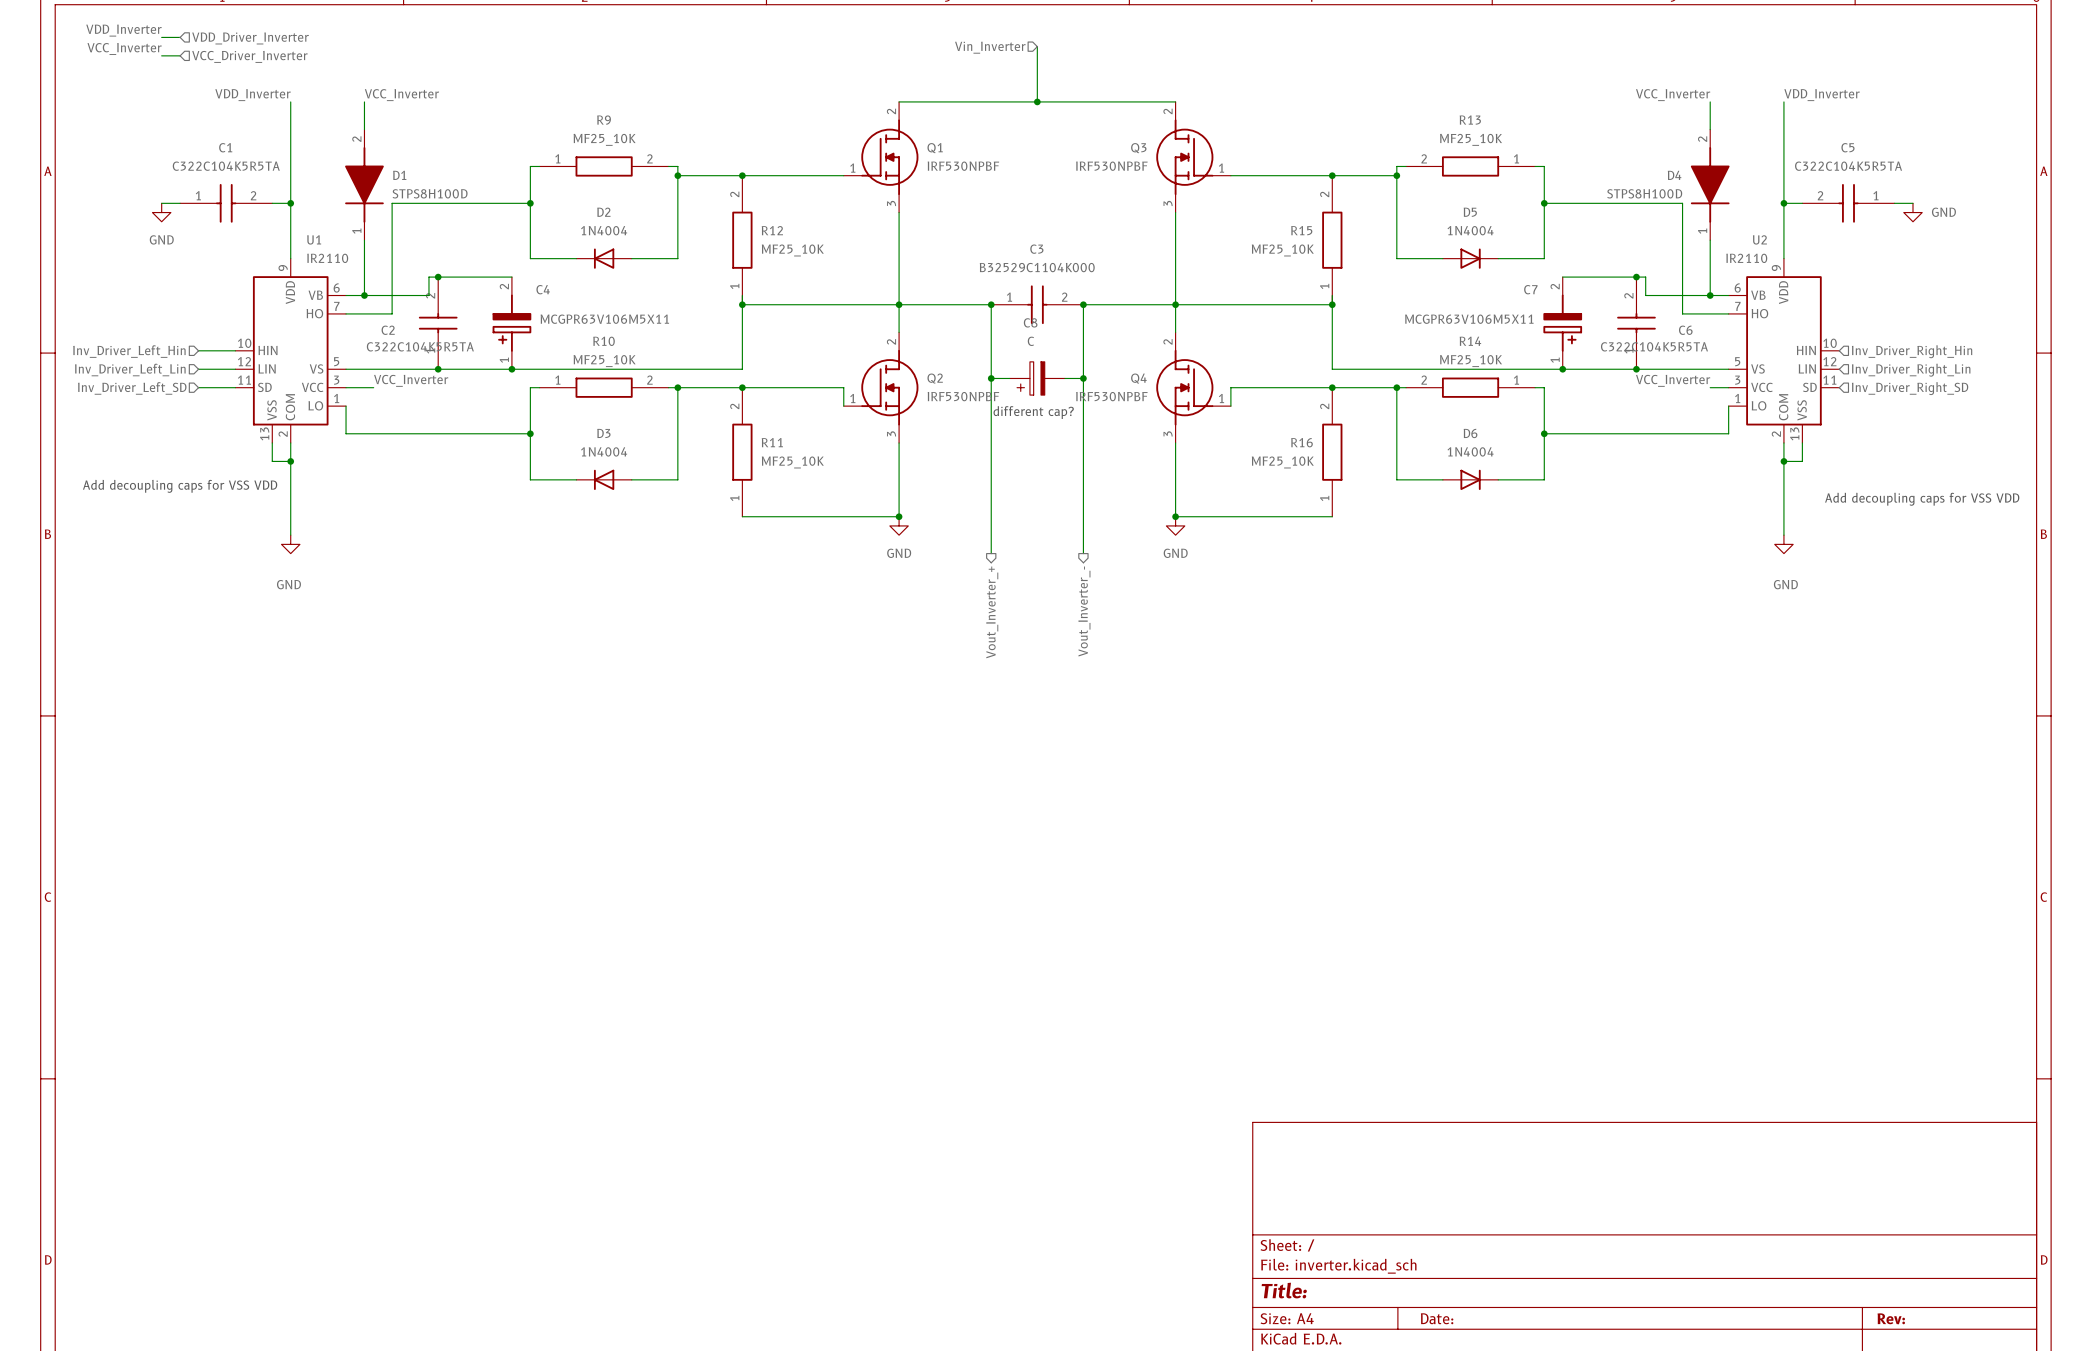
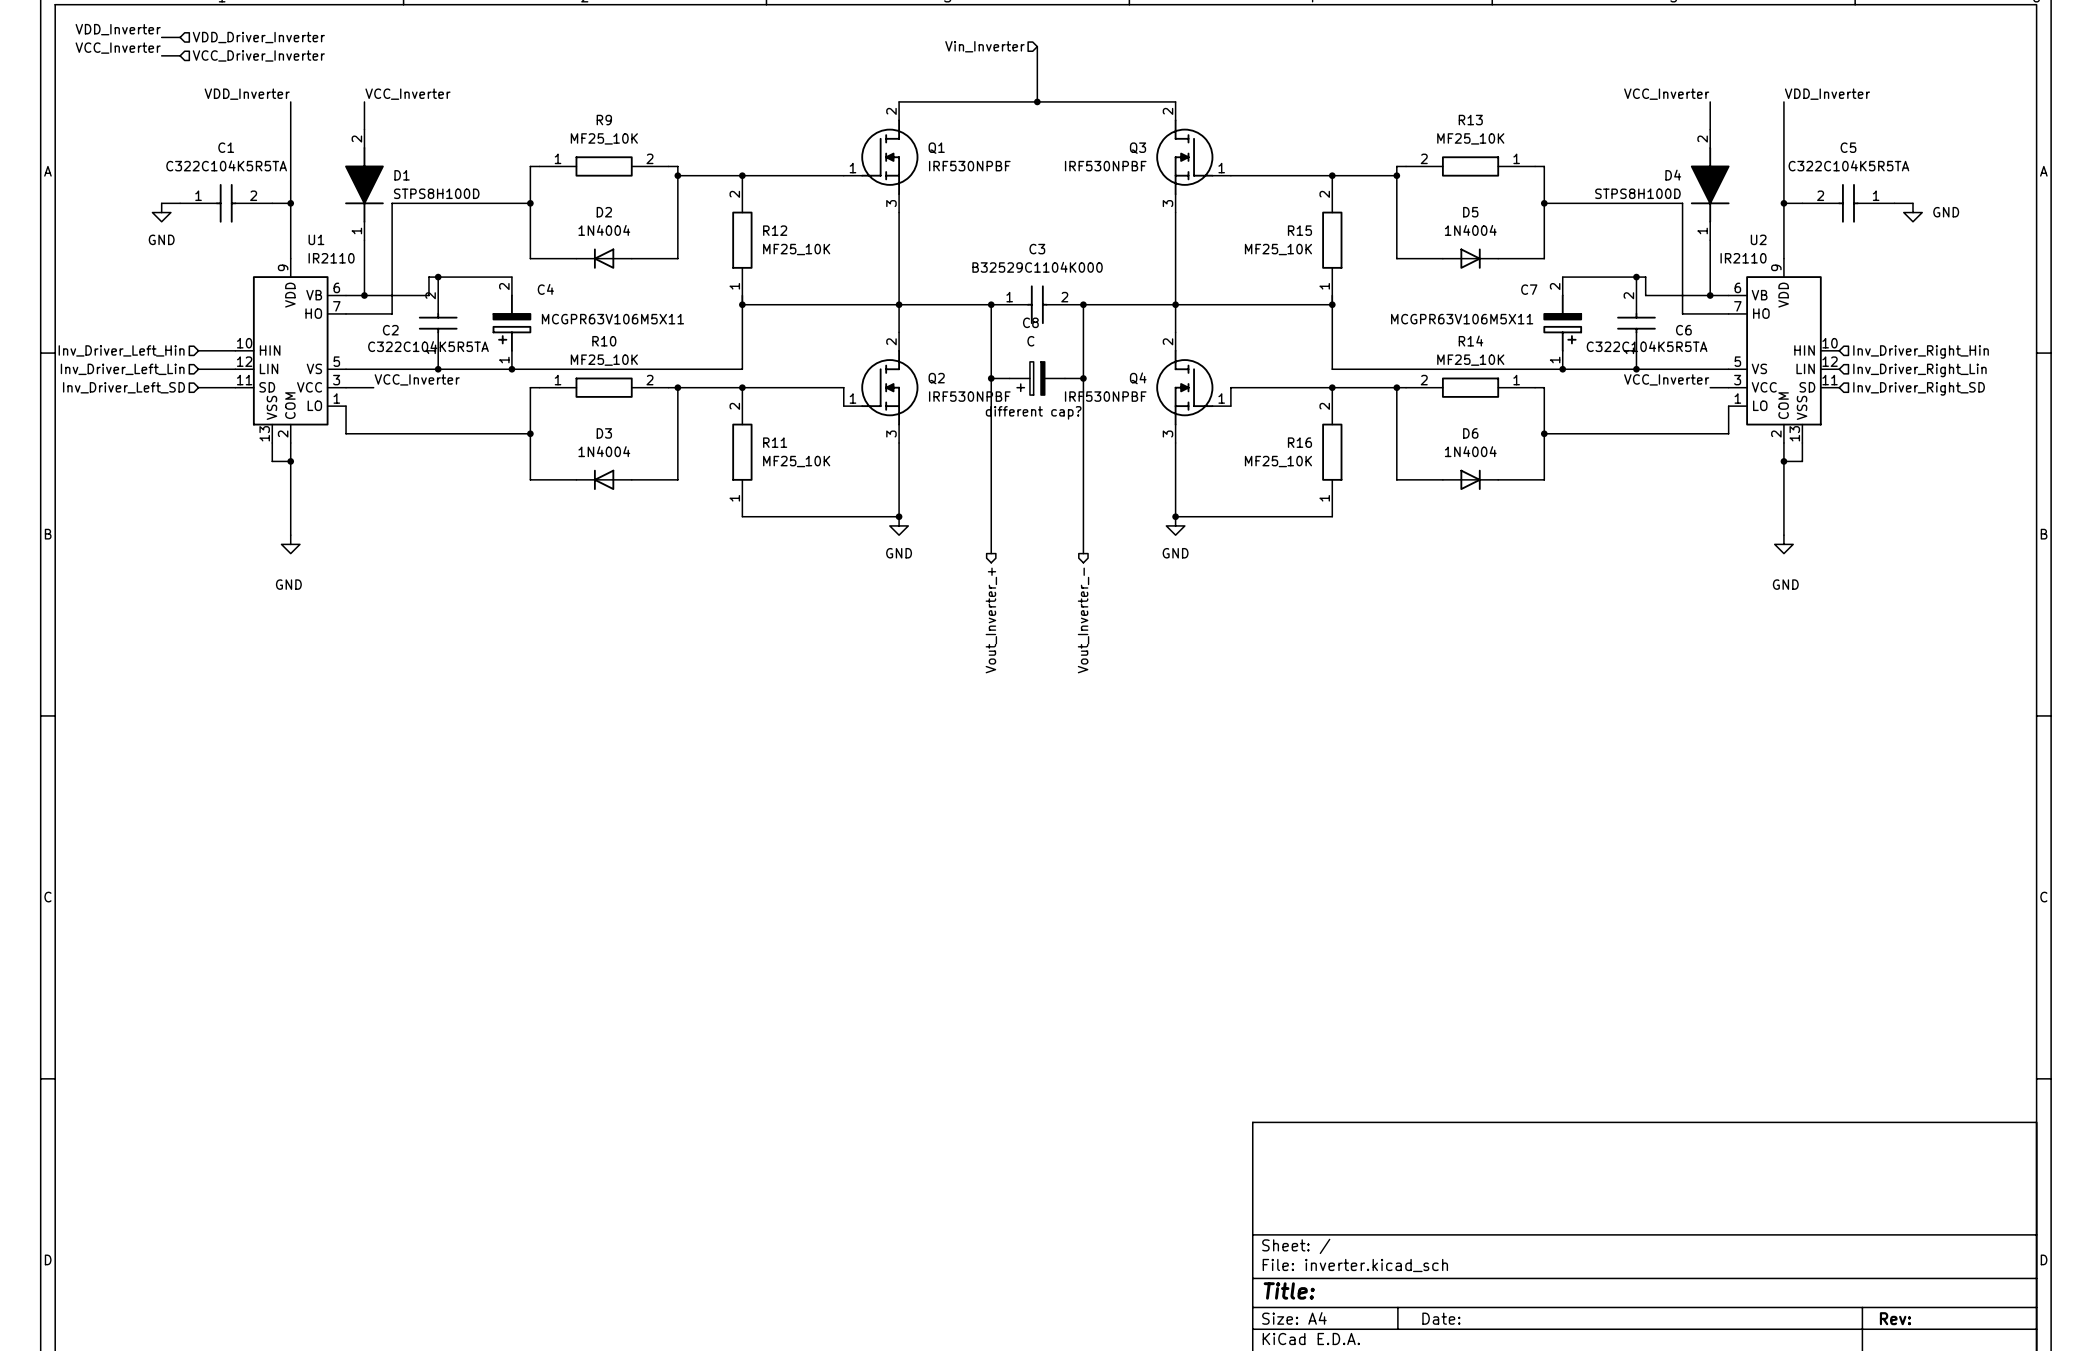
text: Add decoupling caps for VSS VDD (180, 486) -> none
text: Add decoupling caps for VSS VDD (1922, 499) -> none

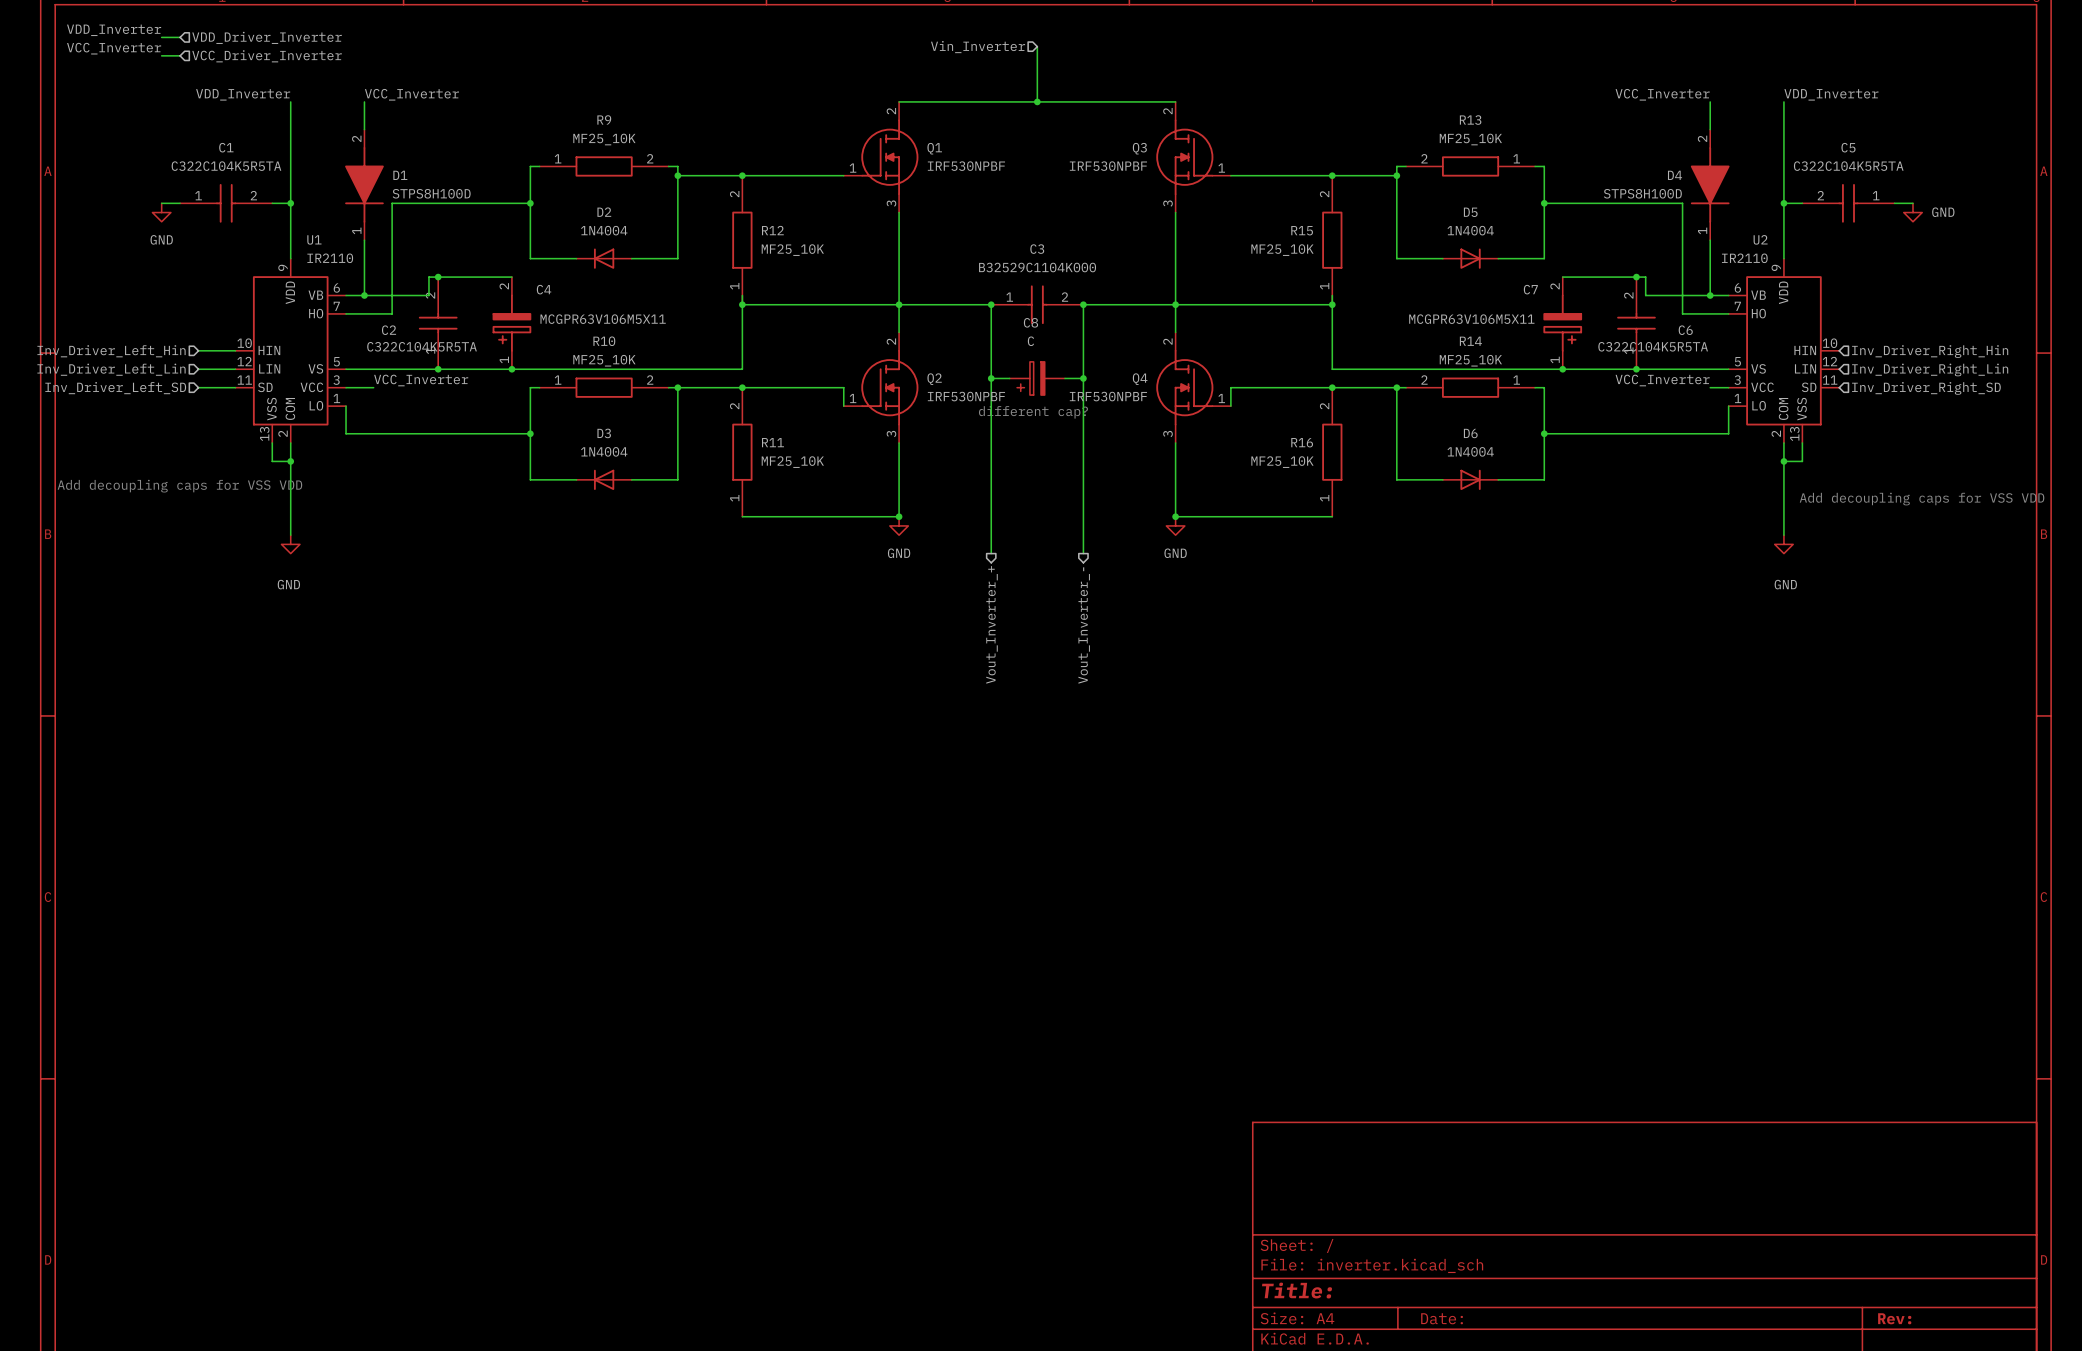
text: none -> Add decoupling caps for VSS VDD (179, 486)
text: none -> Add decoupling caps for VSS VDD (1922, 499)

